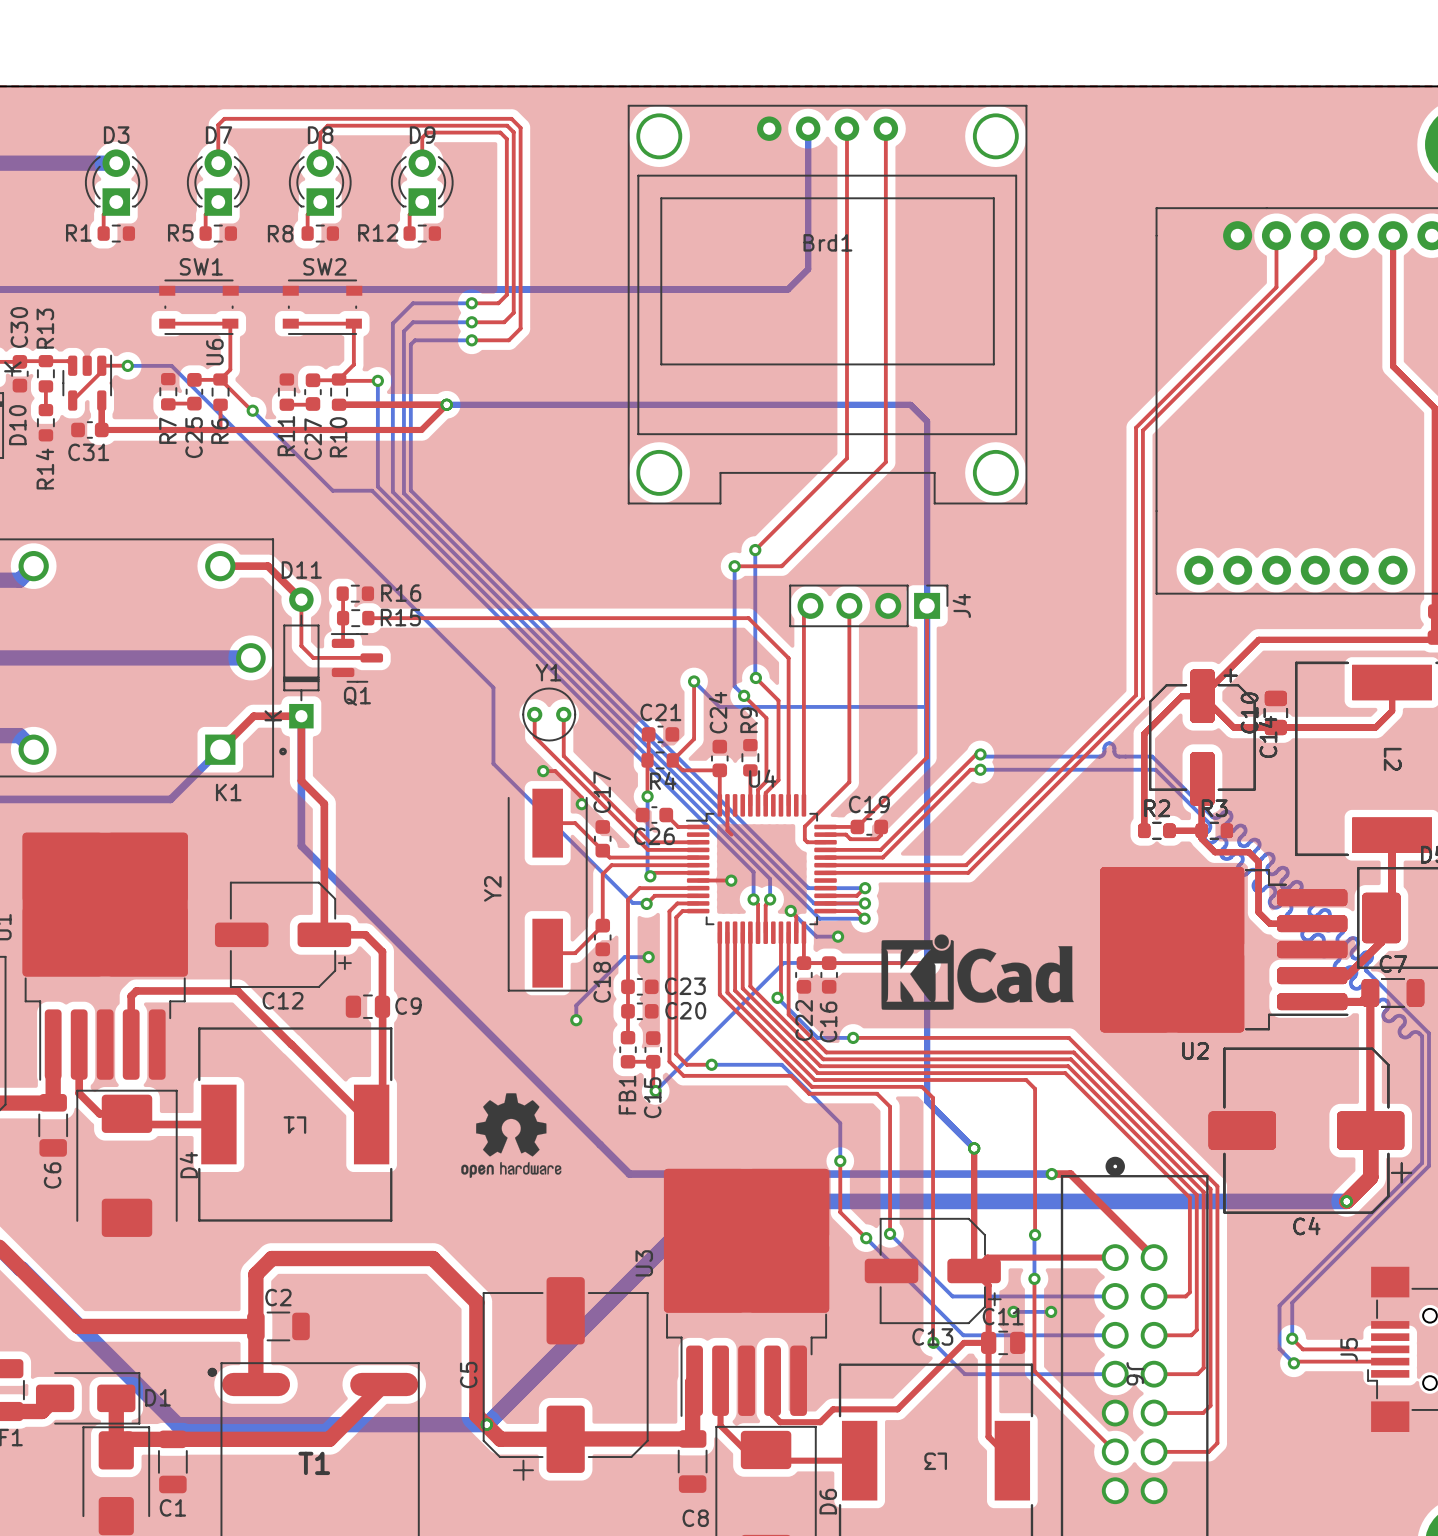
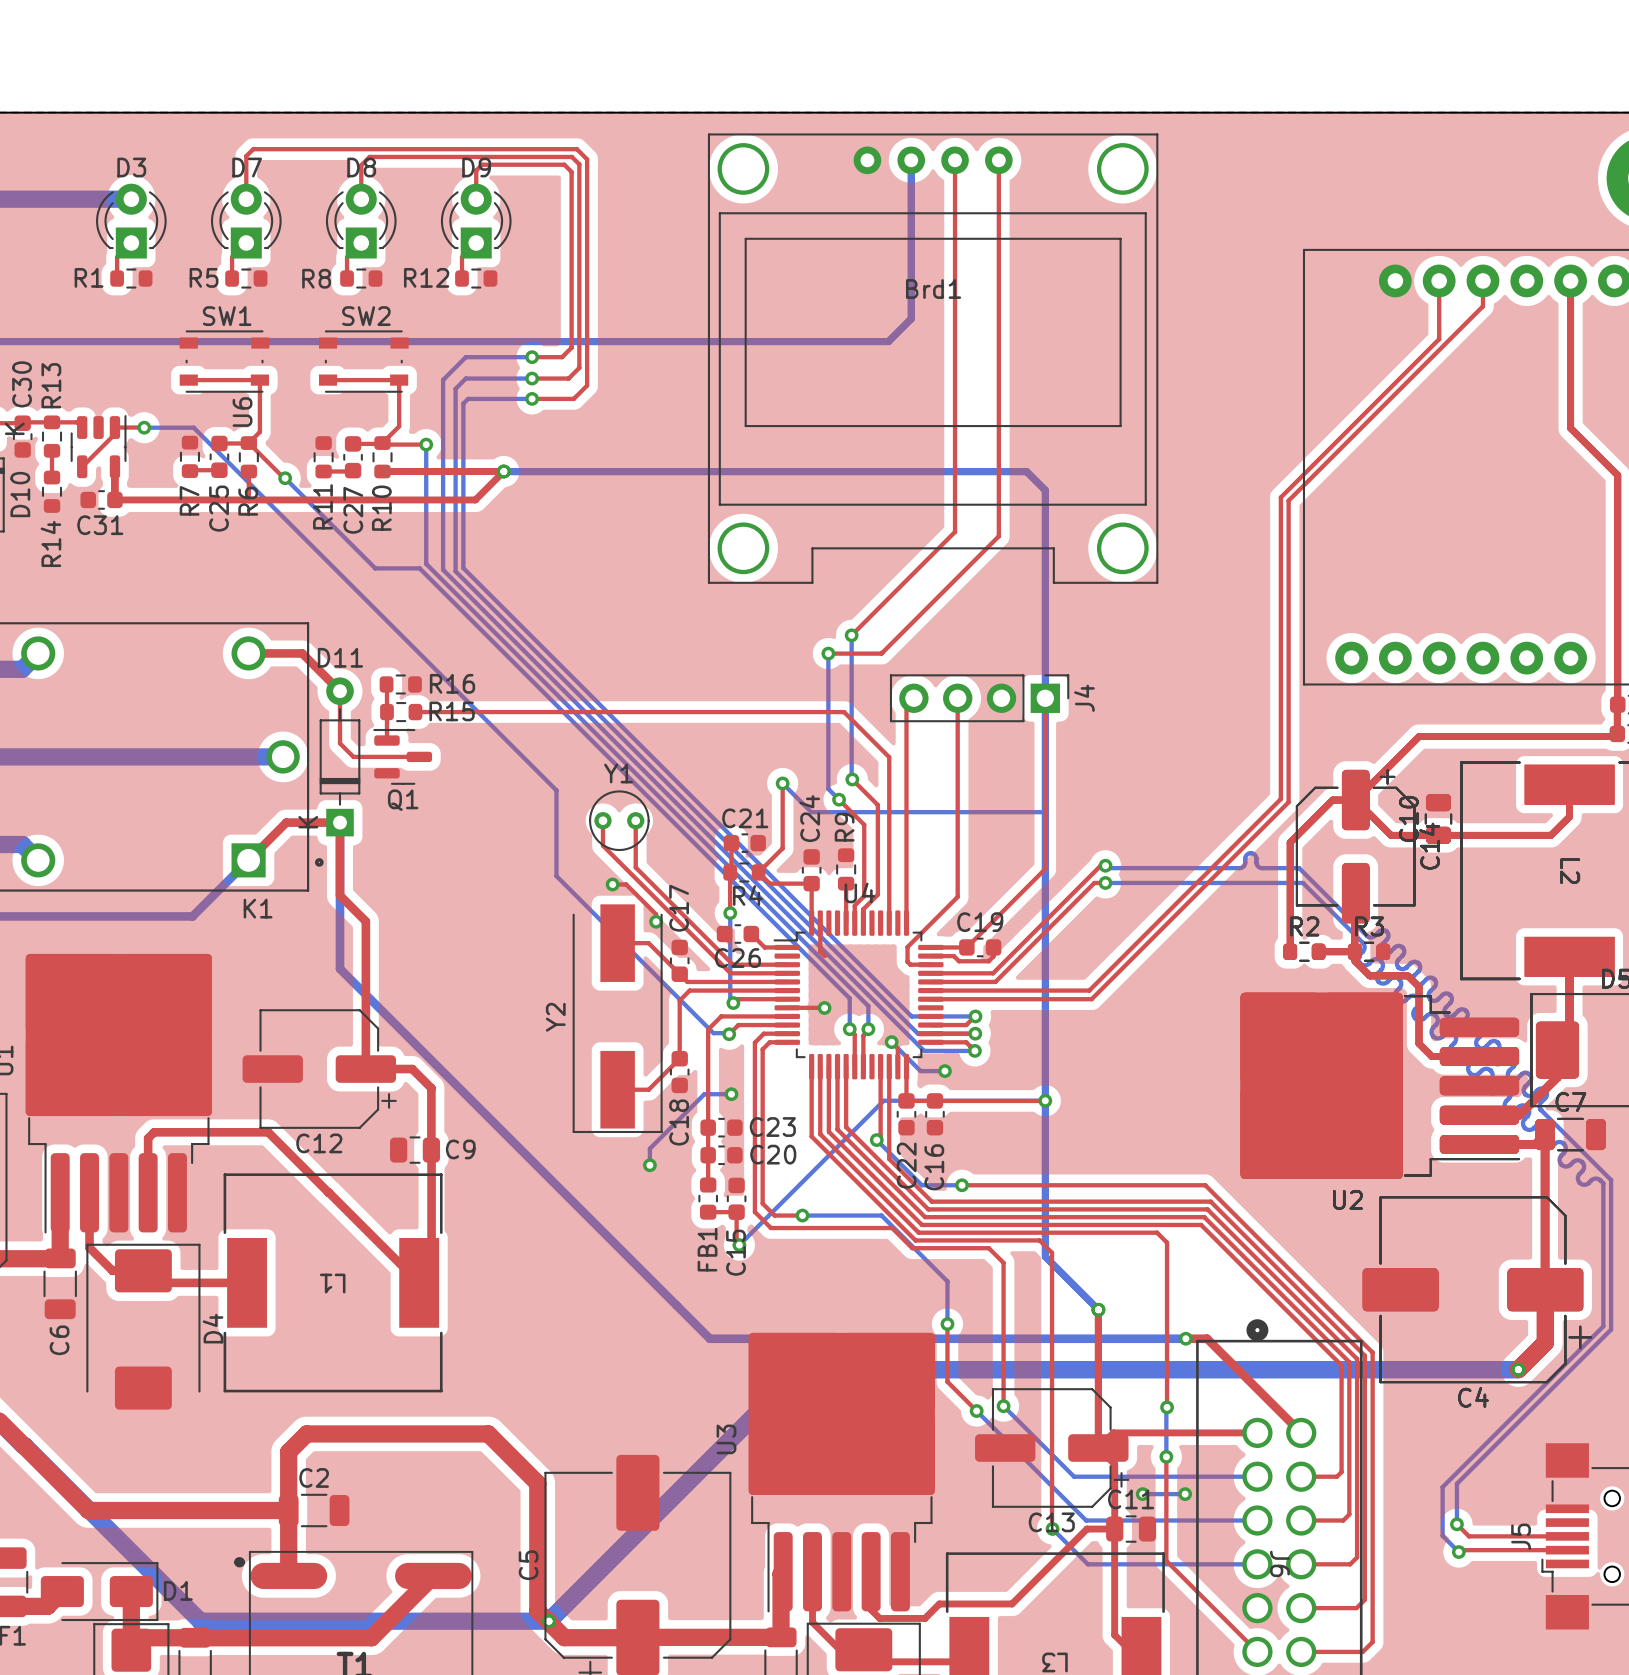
drawing: [881, 934, 1074, 1010] -> none
drawing: [461, 1093, 562, 1178] -> none

